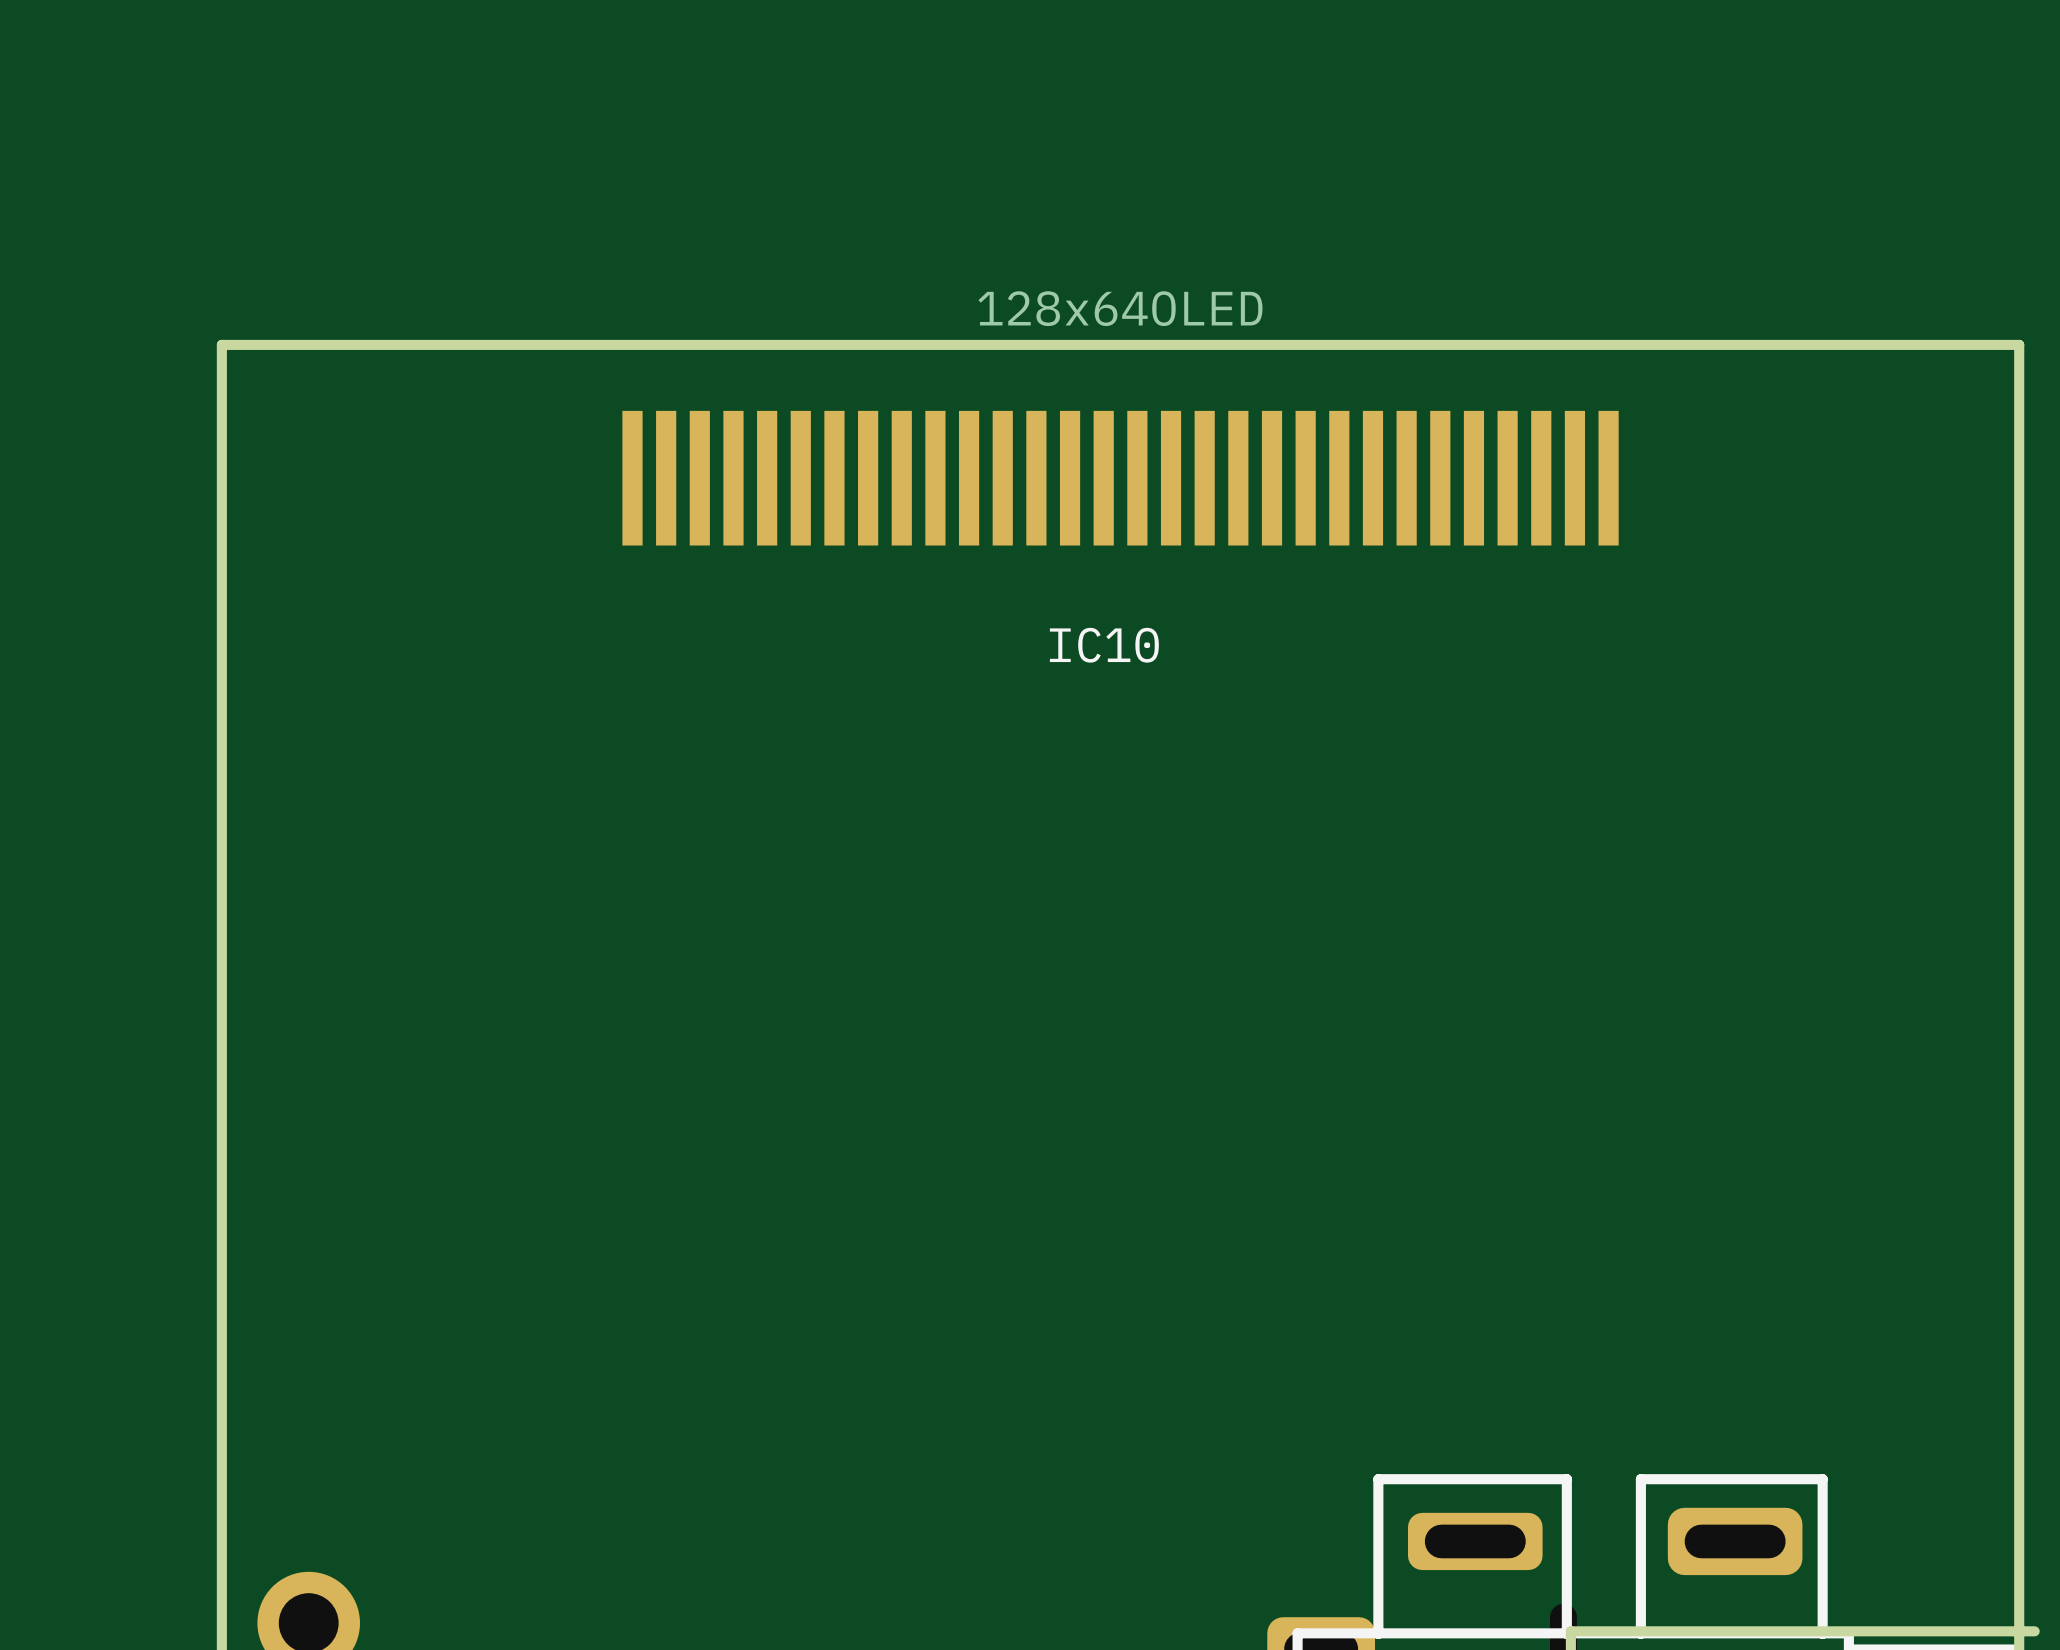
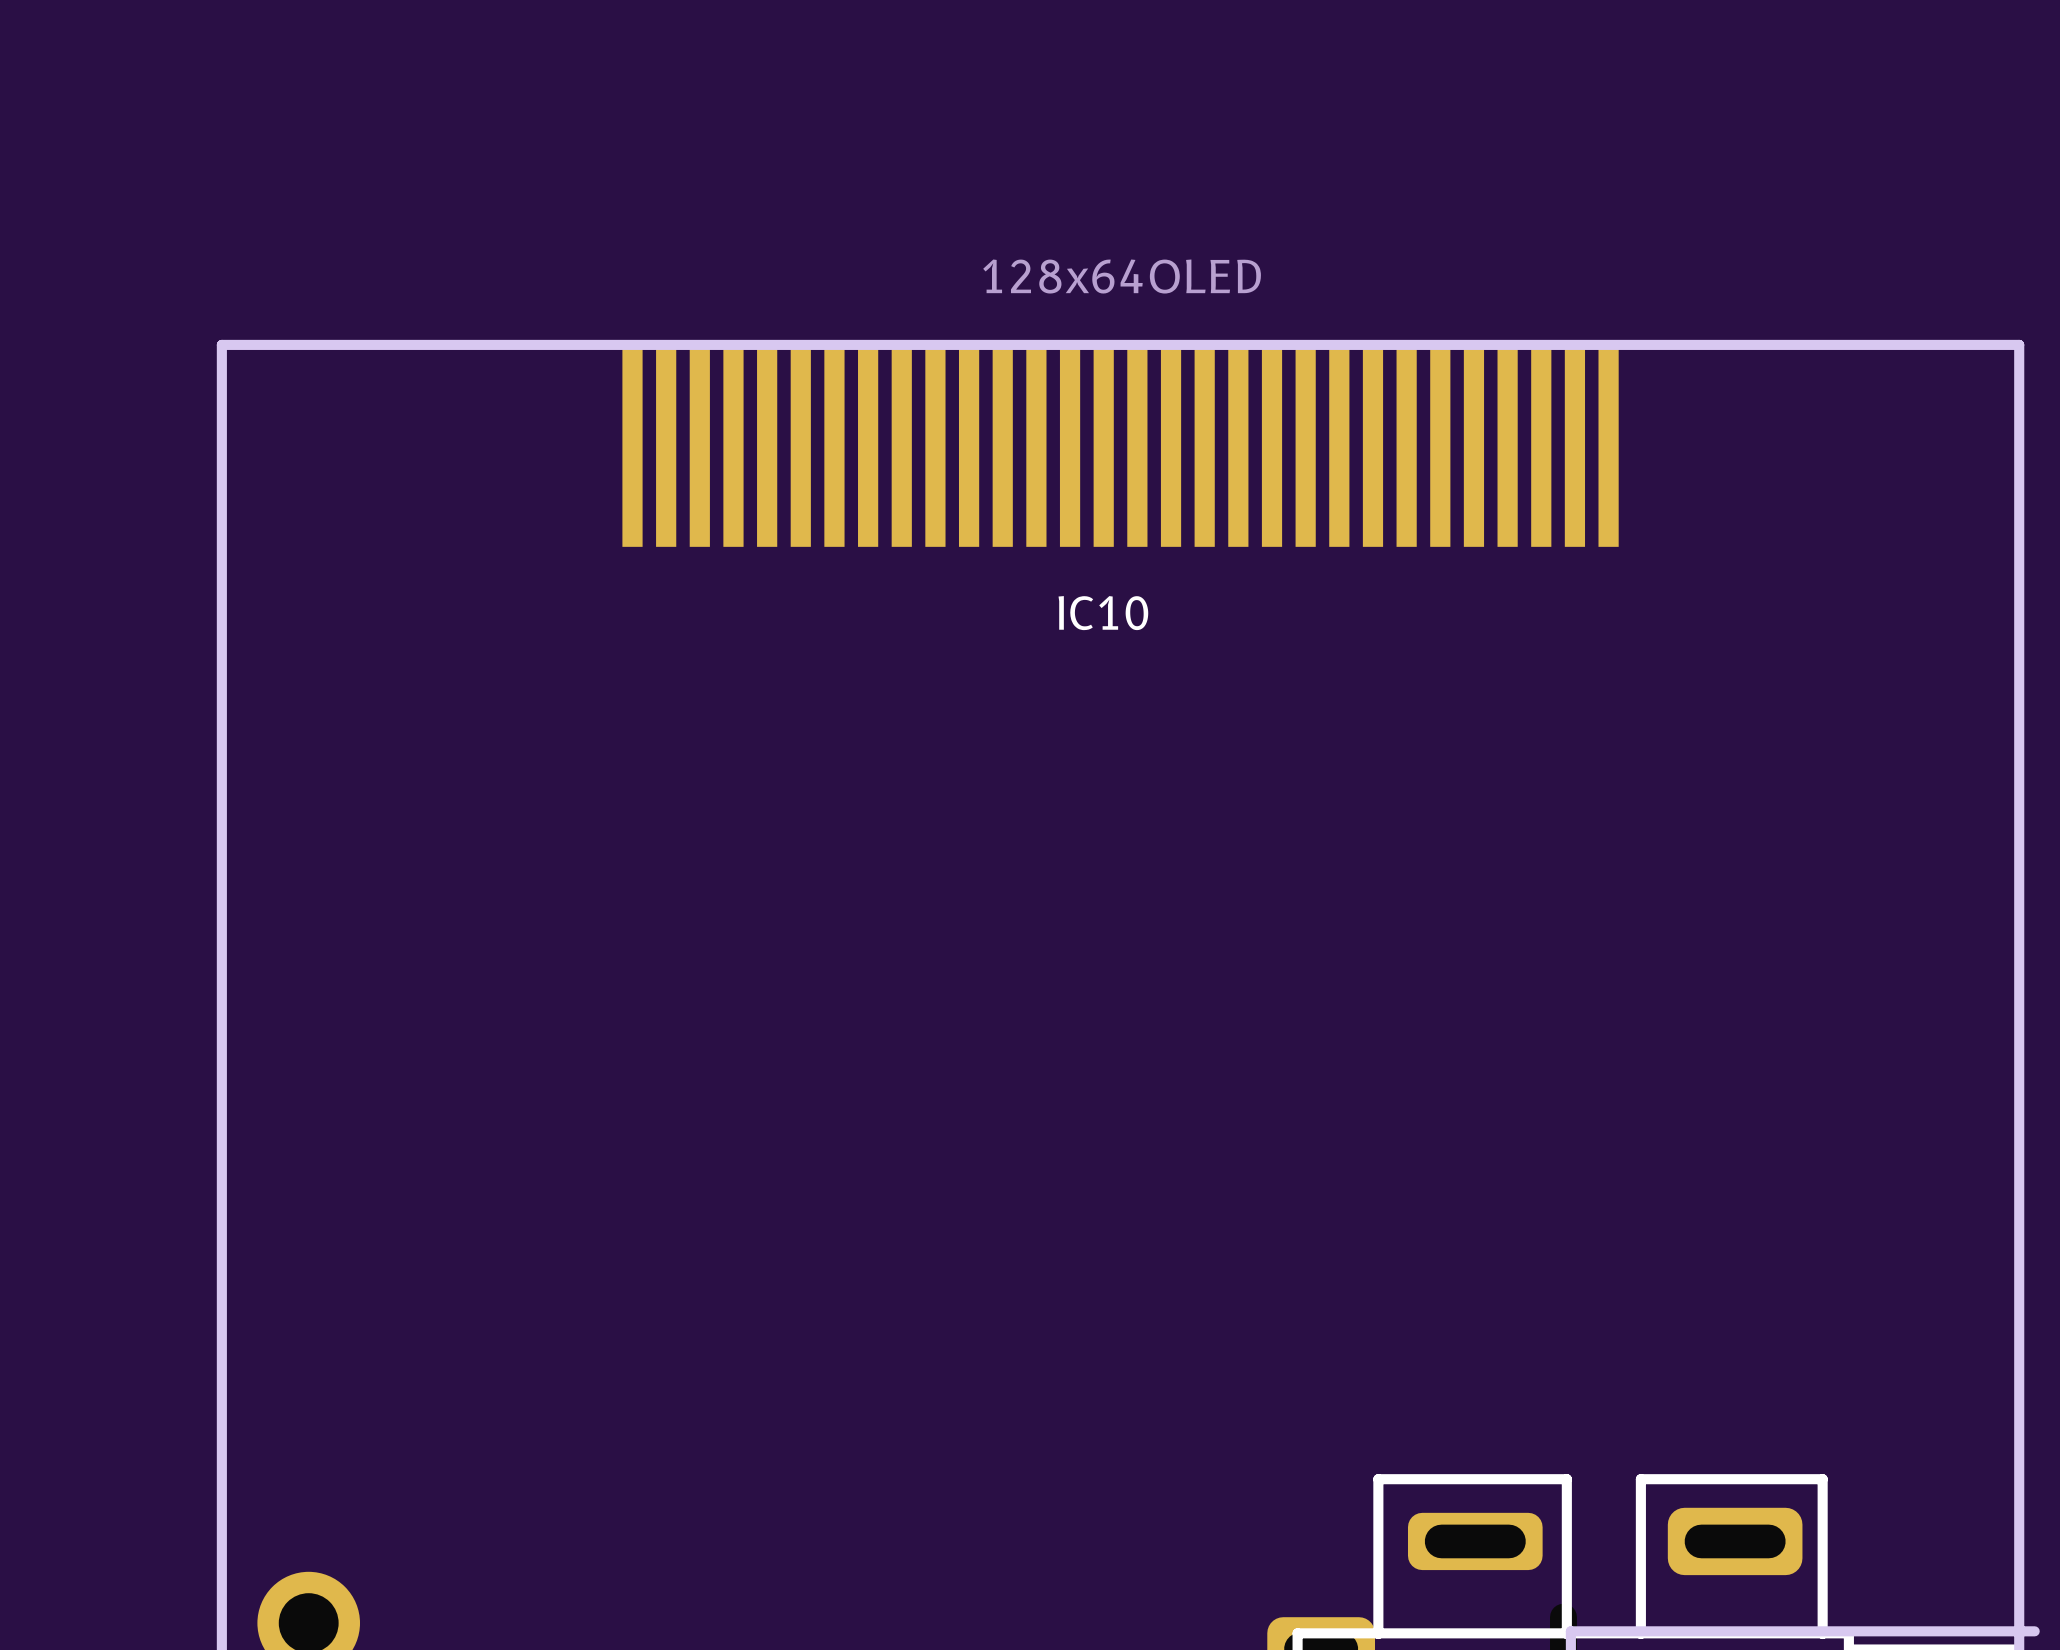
IC10 value position: 128x64OLED (1120, 308) -> 128x64OLED (1122, 276)
IC10 footprint: [622, 410, 1619, 546] -> [622, 344, 1619, 547]
IC10 name position: IC10 (1104, 645) -> IC10 (1103, 613)

